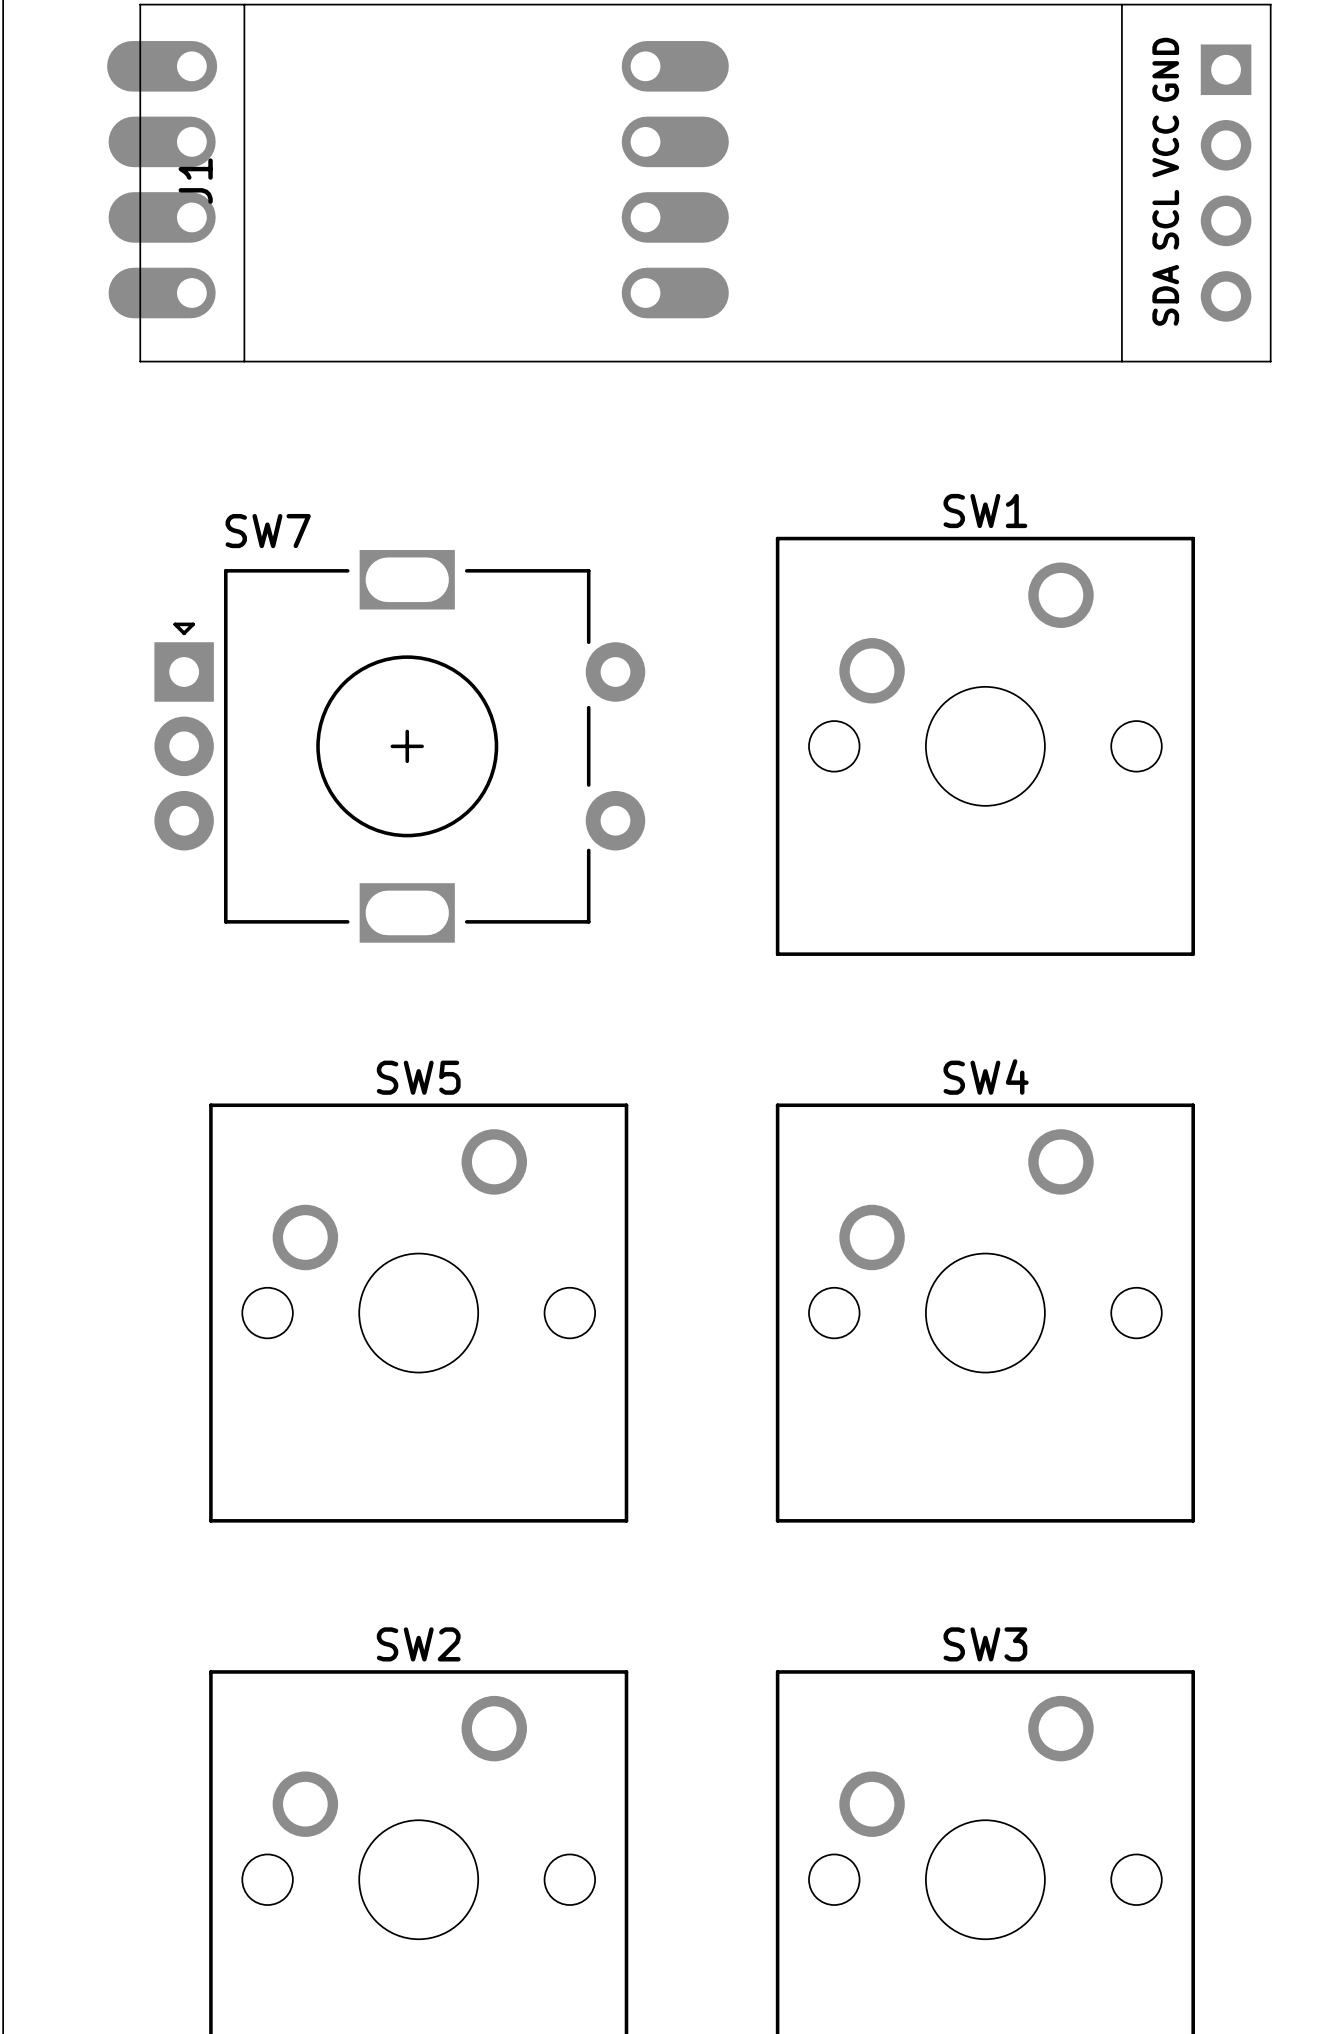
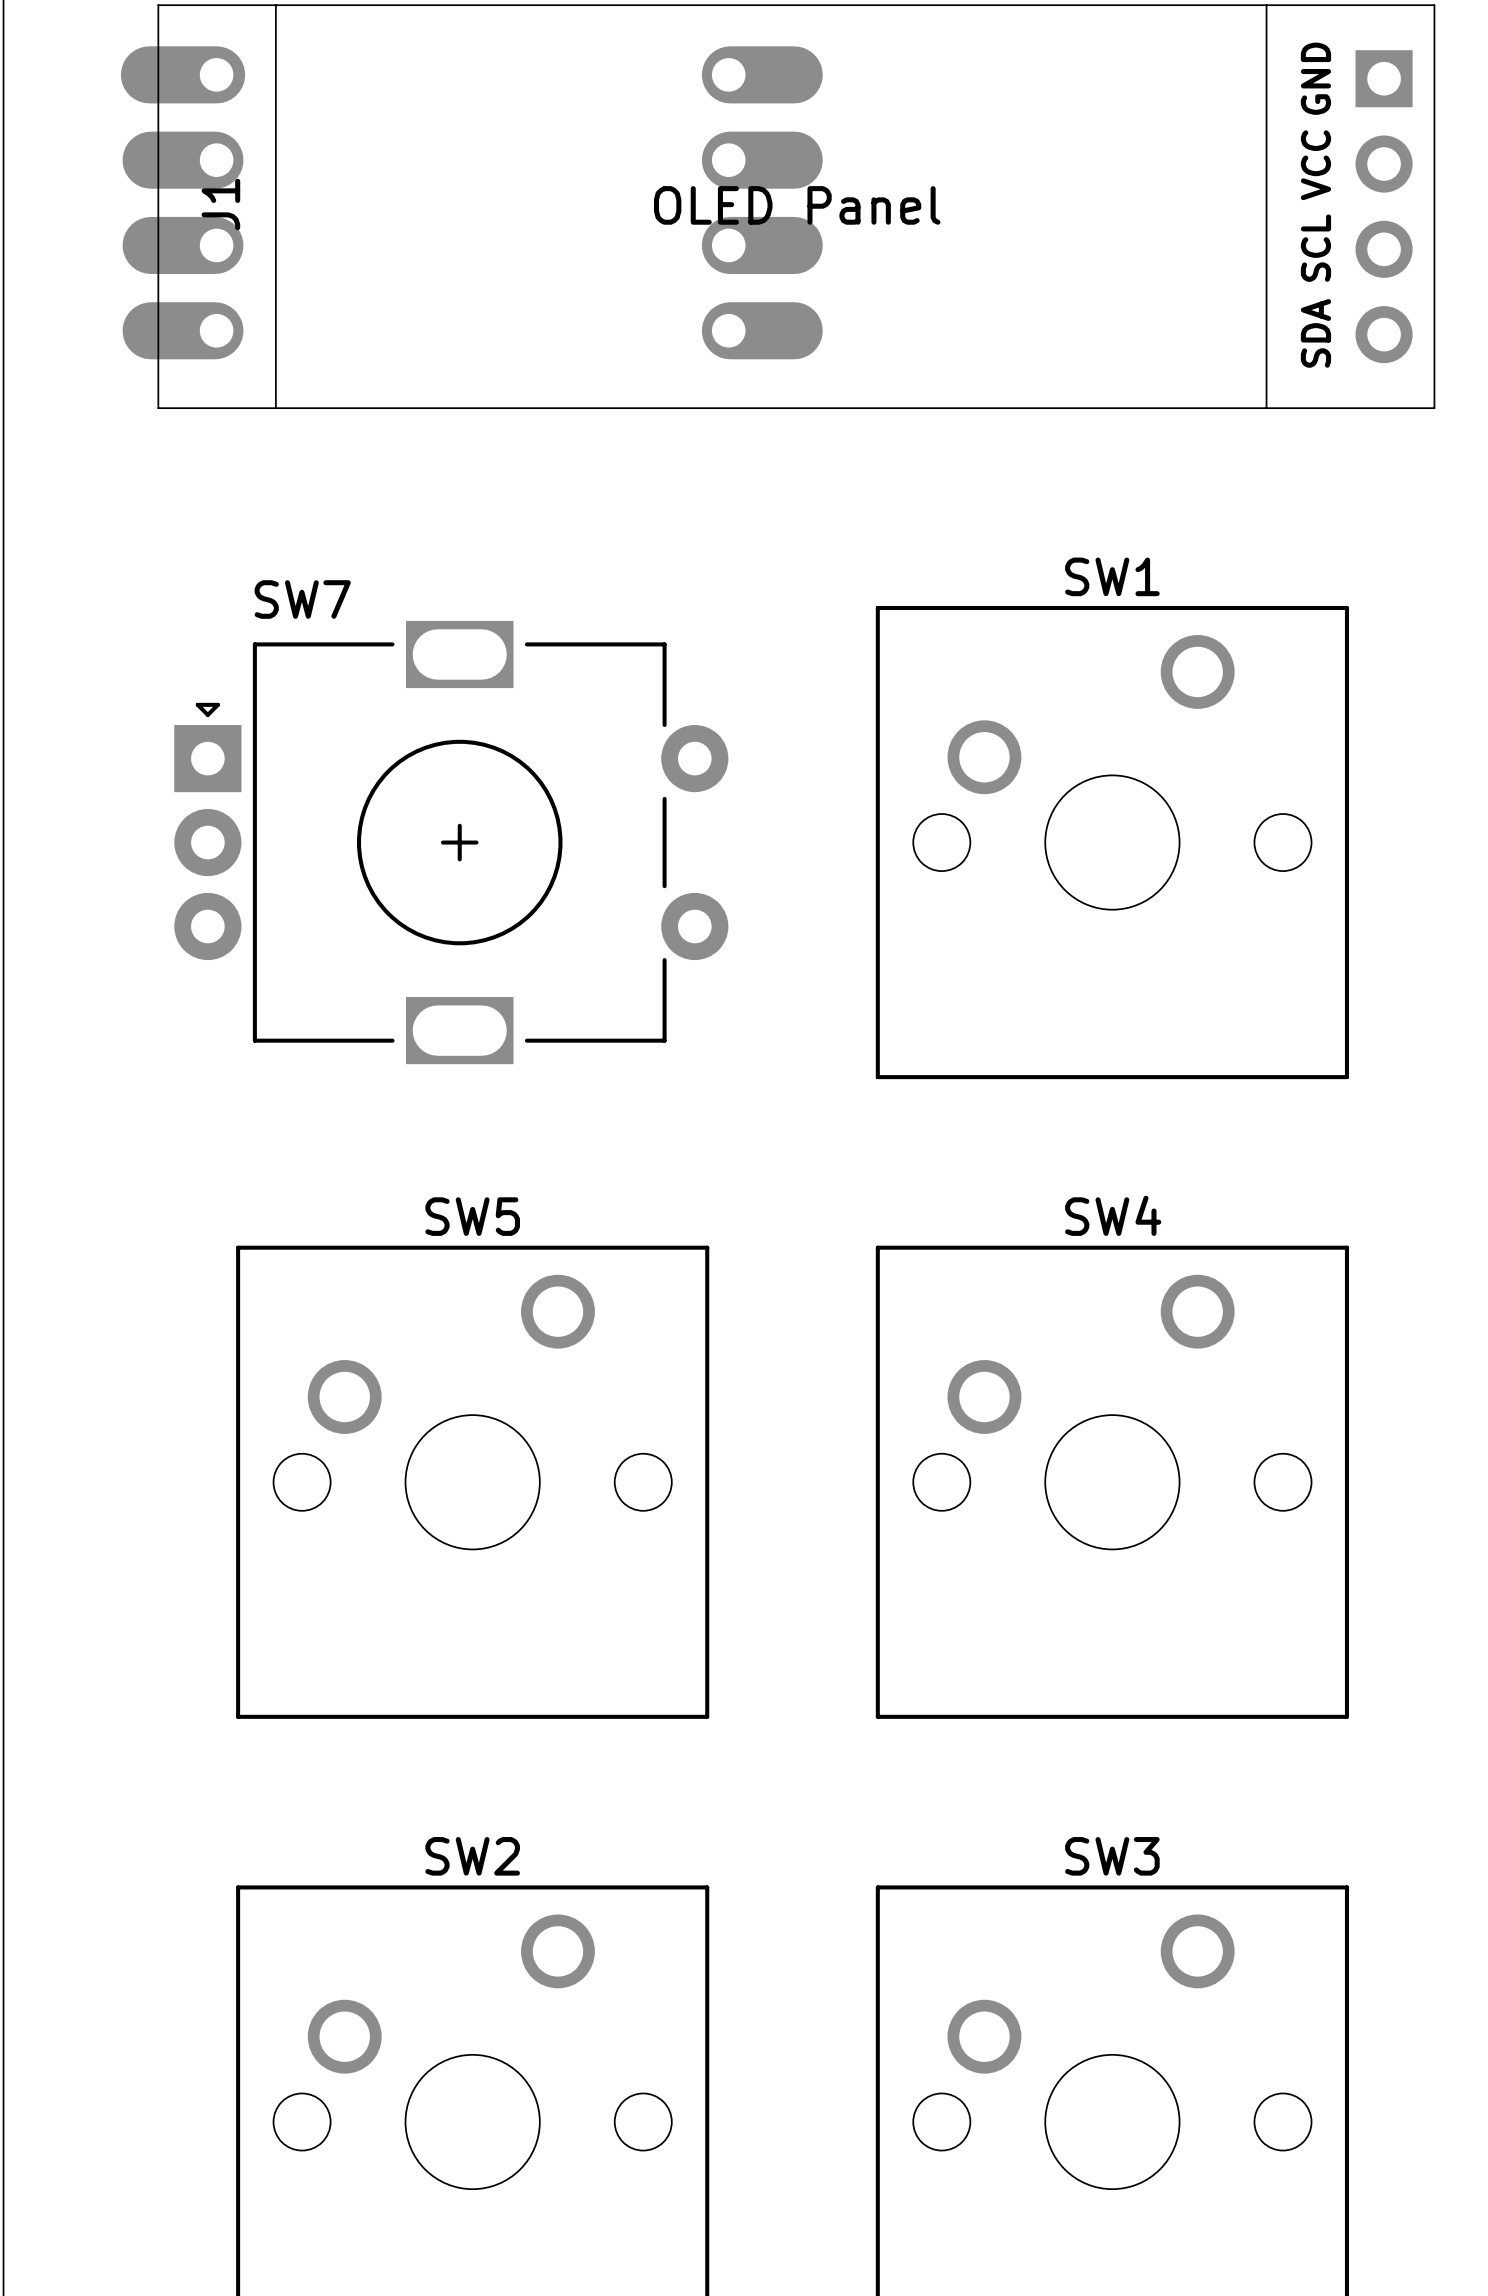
J1 text: none -> OLED Panel (797, 205)

